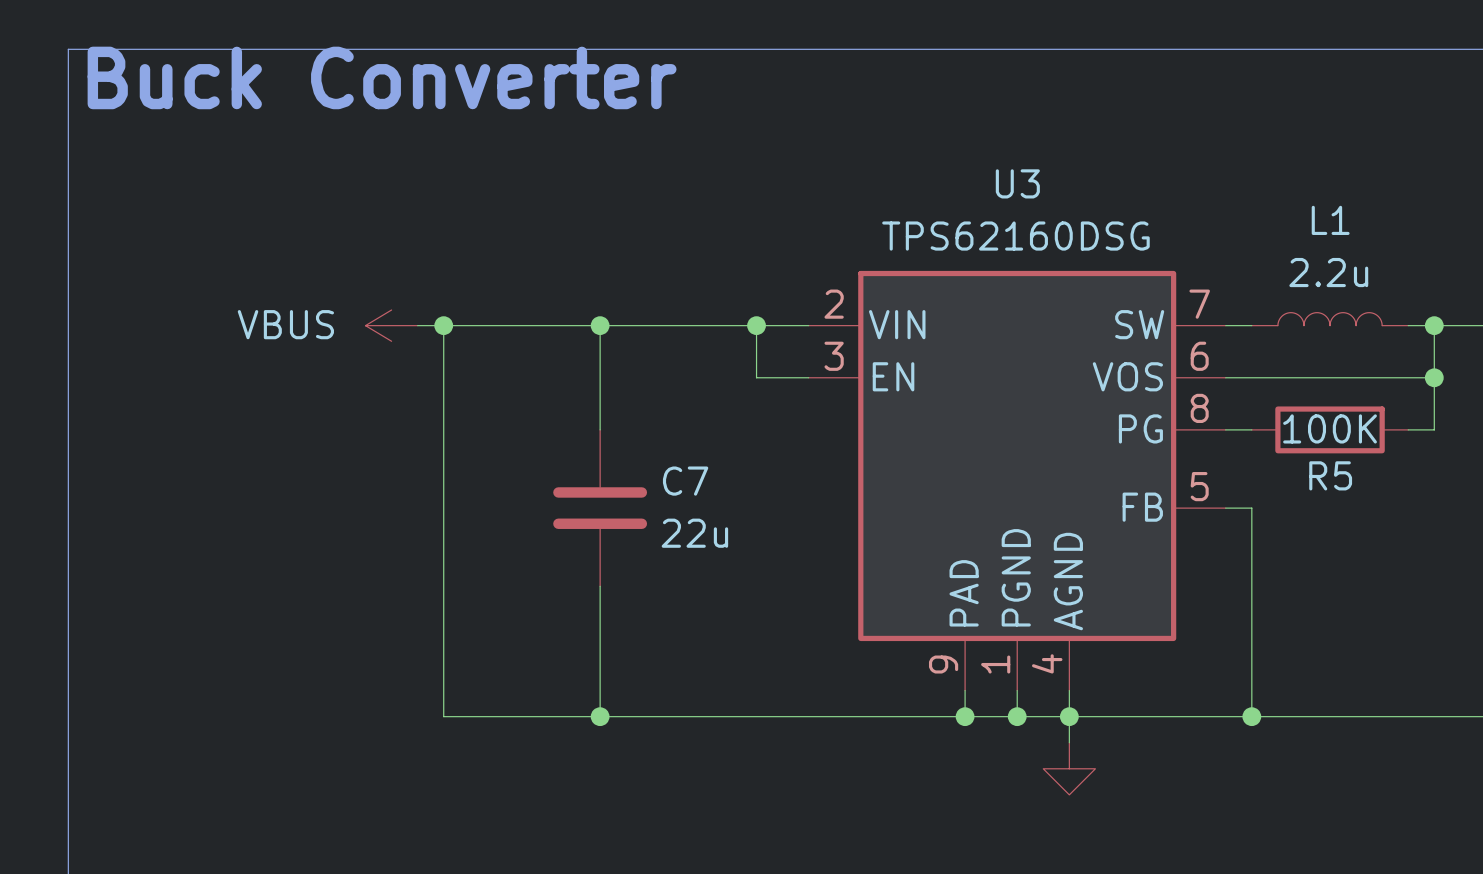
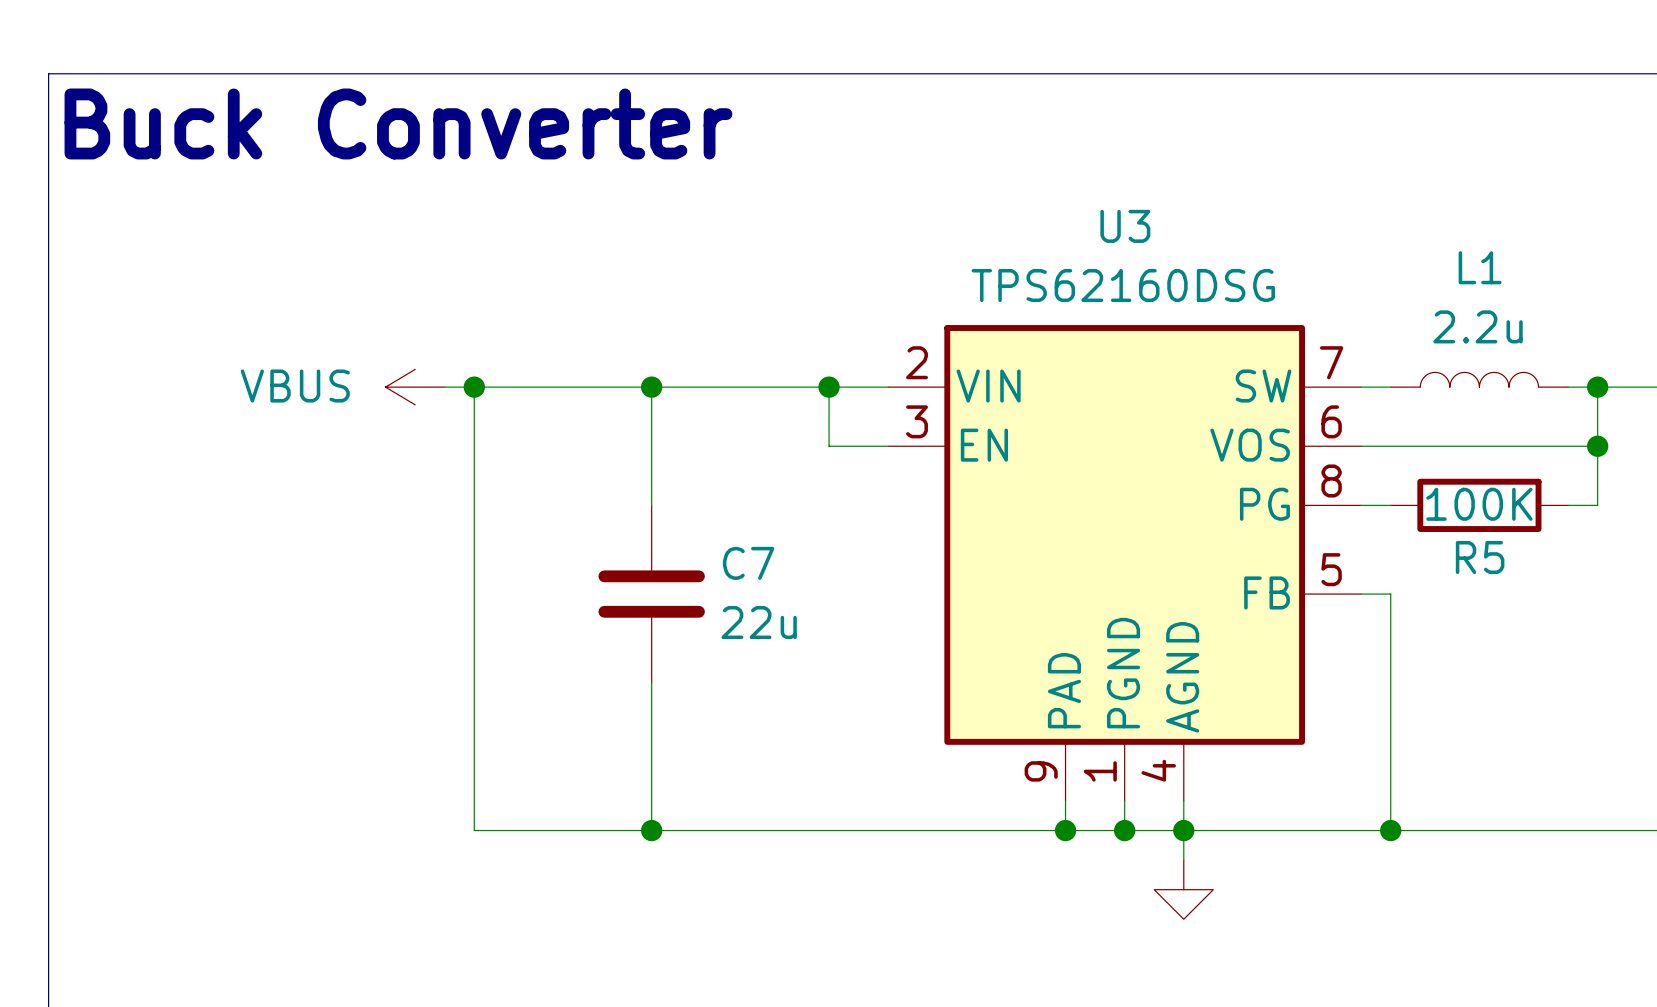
text position: Buck Converter (382, 77) -> Buck Converter (398, 123)

